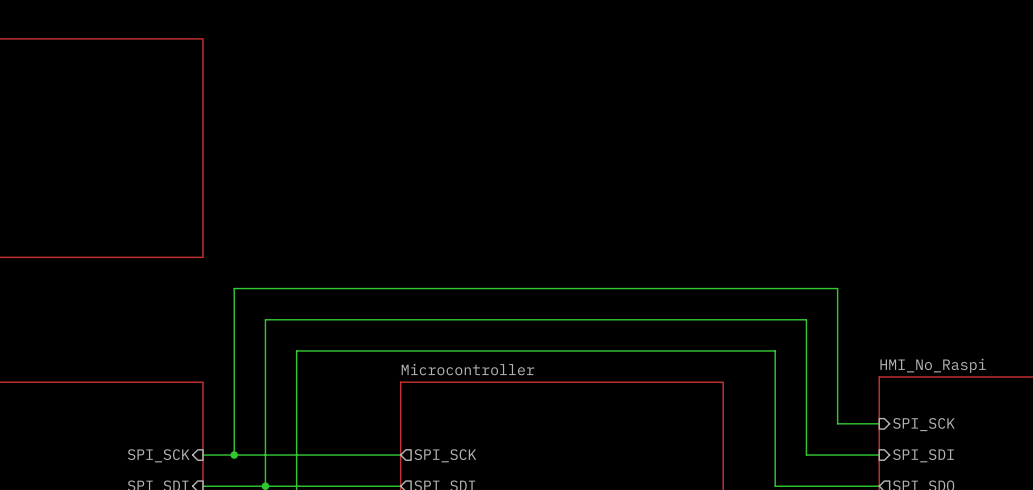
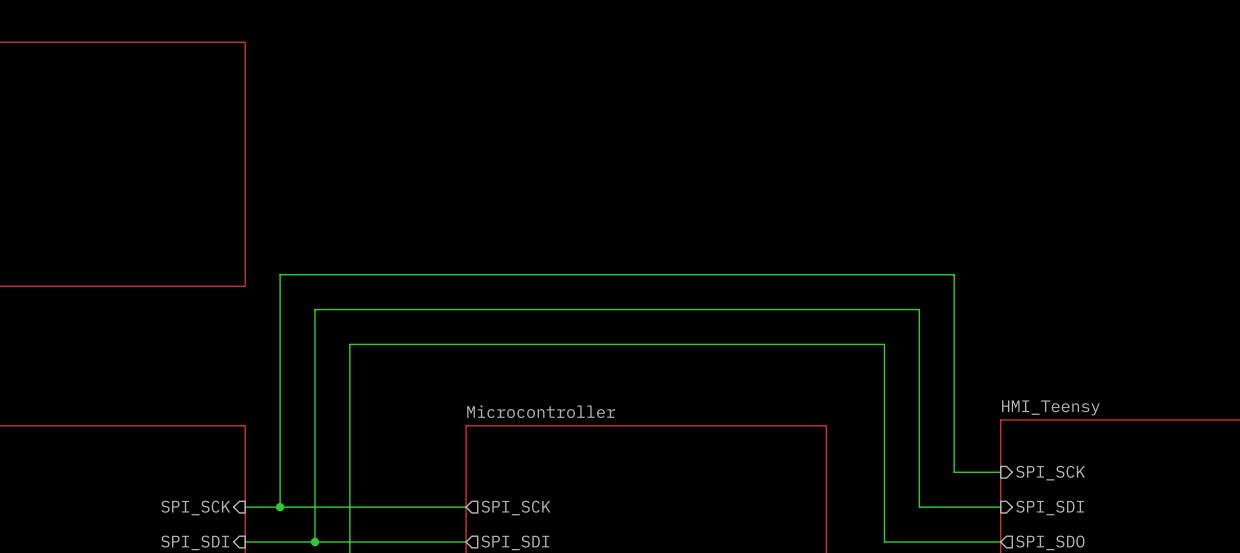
wire: (234, 288) (837, 288) -> (280, 321) (280, 274) (954, 274) (954, 321)
wire: (265, 319) (806, 319) -> (314, 356) (314, 309) (919, 309) (919, 356)
wire: (296, 350) (775, 350) -> (349, 390) (349, 344) (884, 344) (884, 390)
sheet HMI_No_Raspi name: HMI_No_Raspi (933, 365) -> HMI_Teensy (1050, 407)

